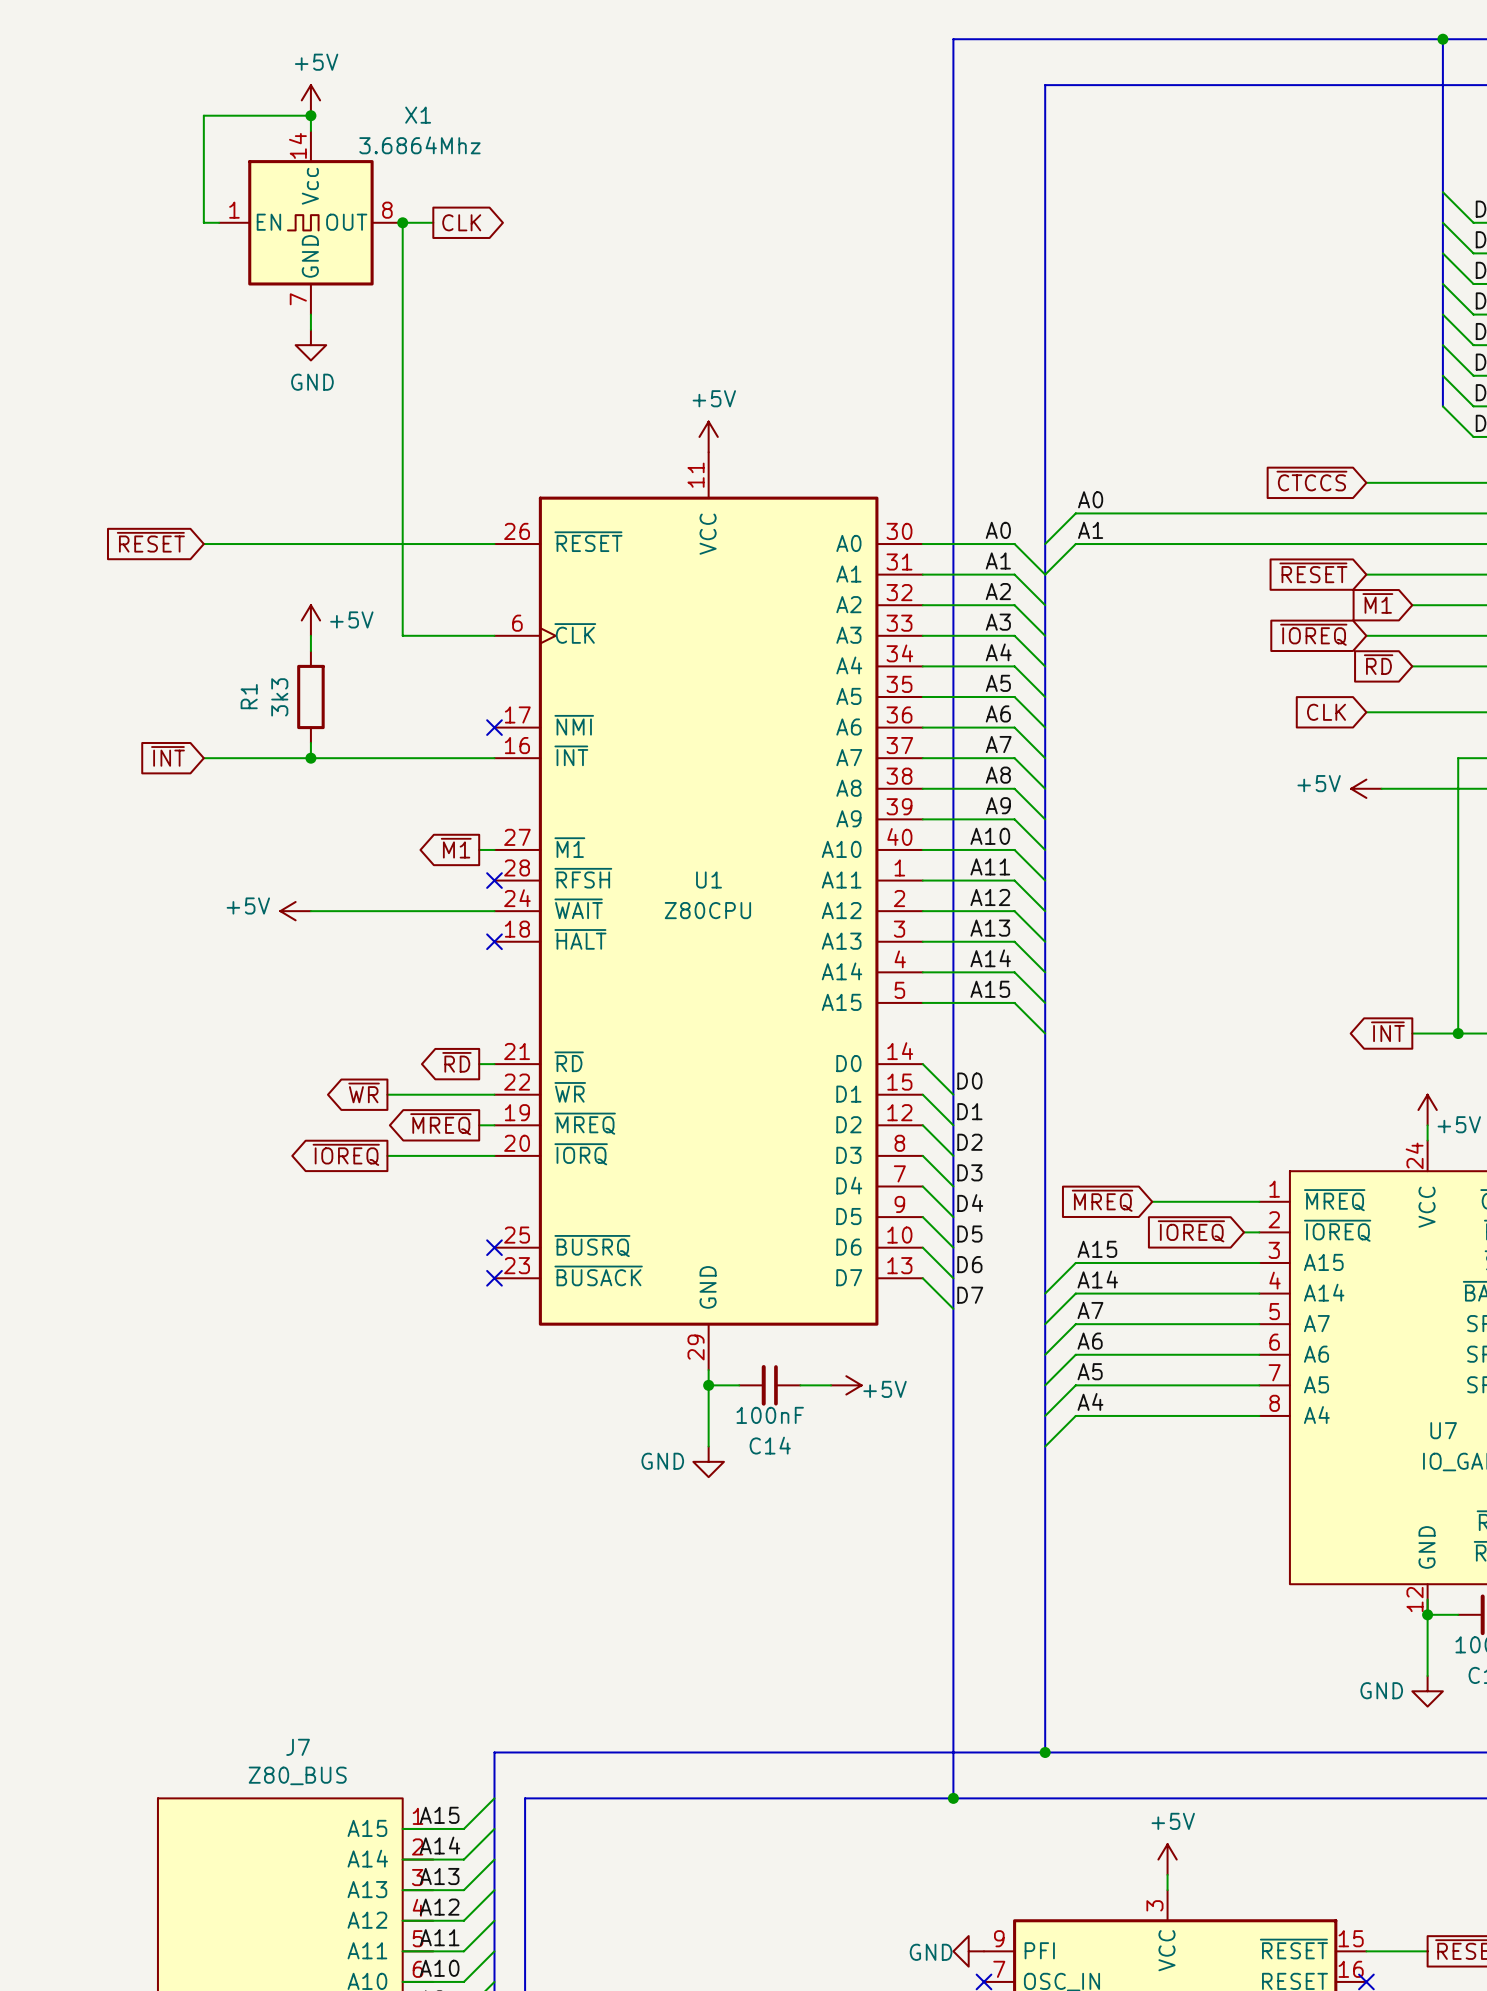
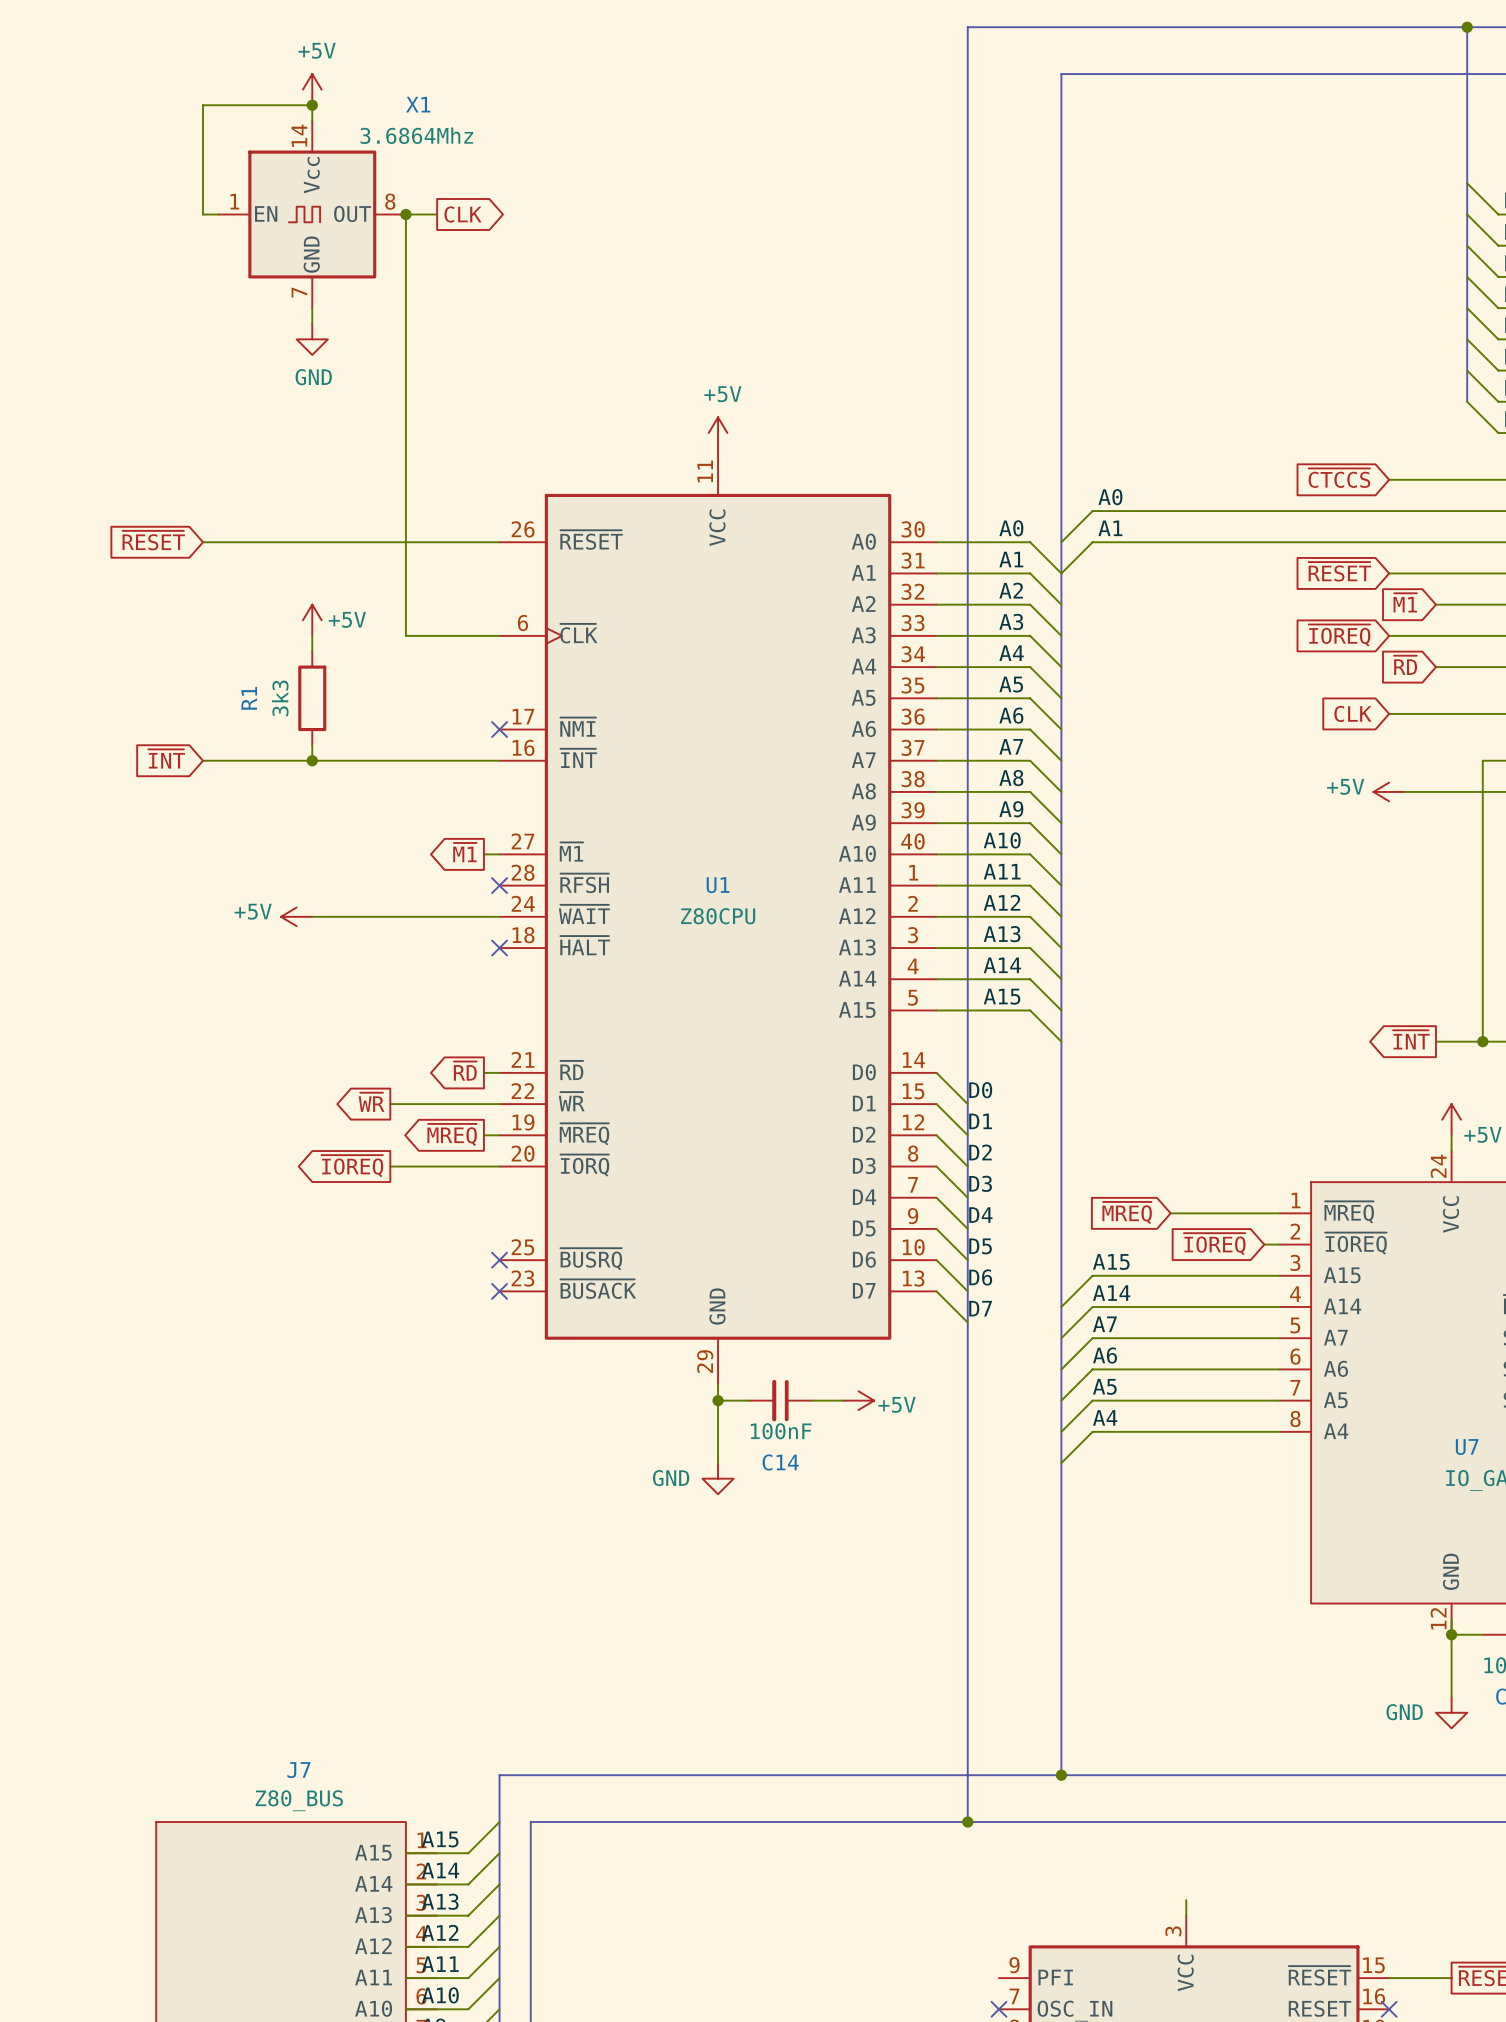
power symbol: +5V (1167, 1859) -> none
power symbol: GND (968, 1951) -> none

